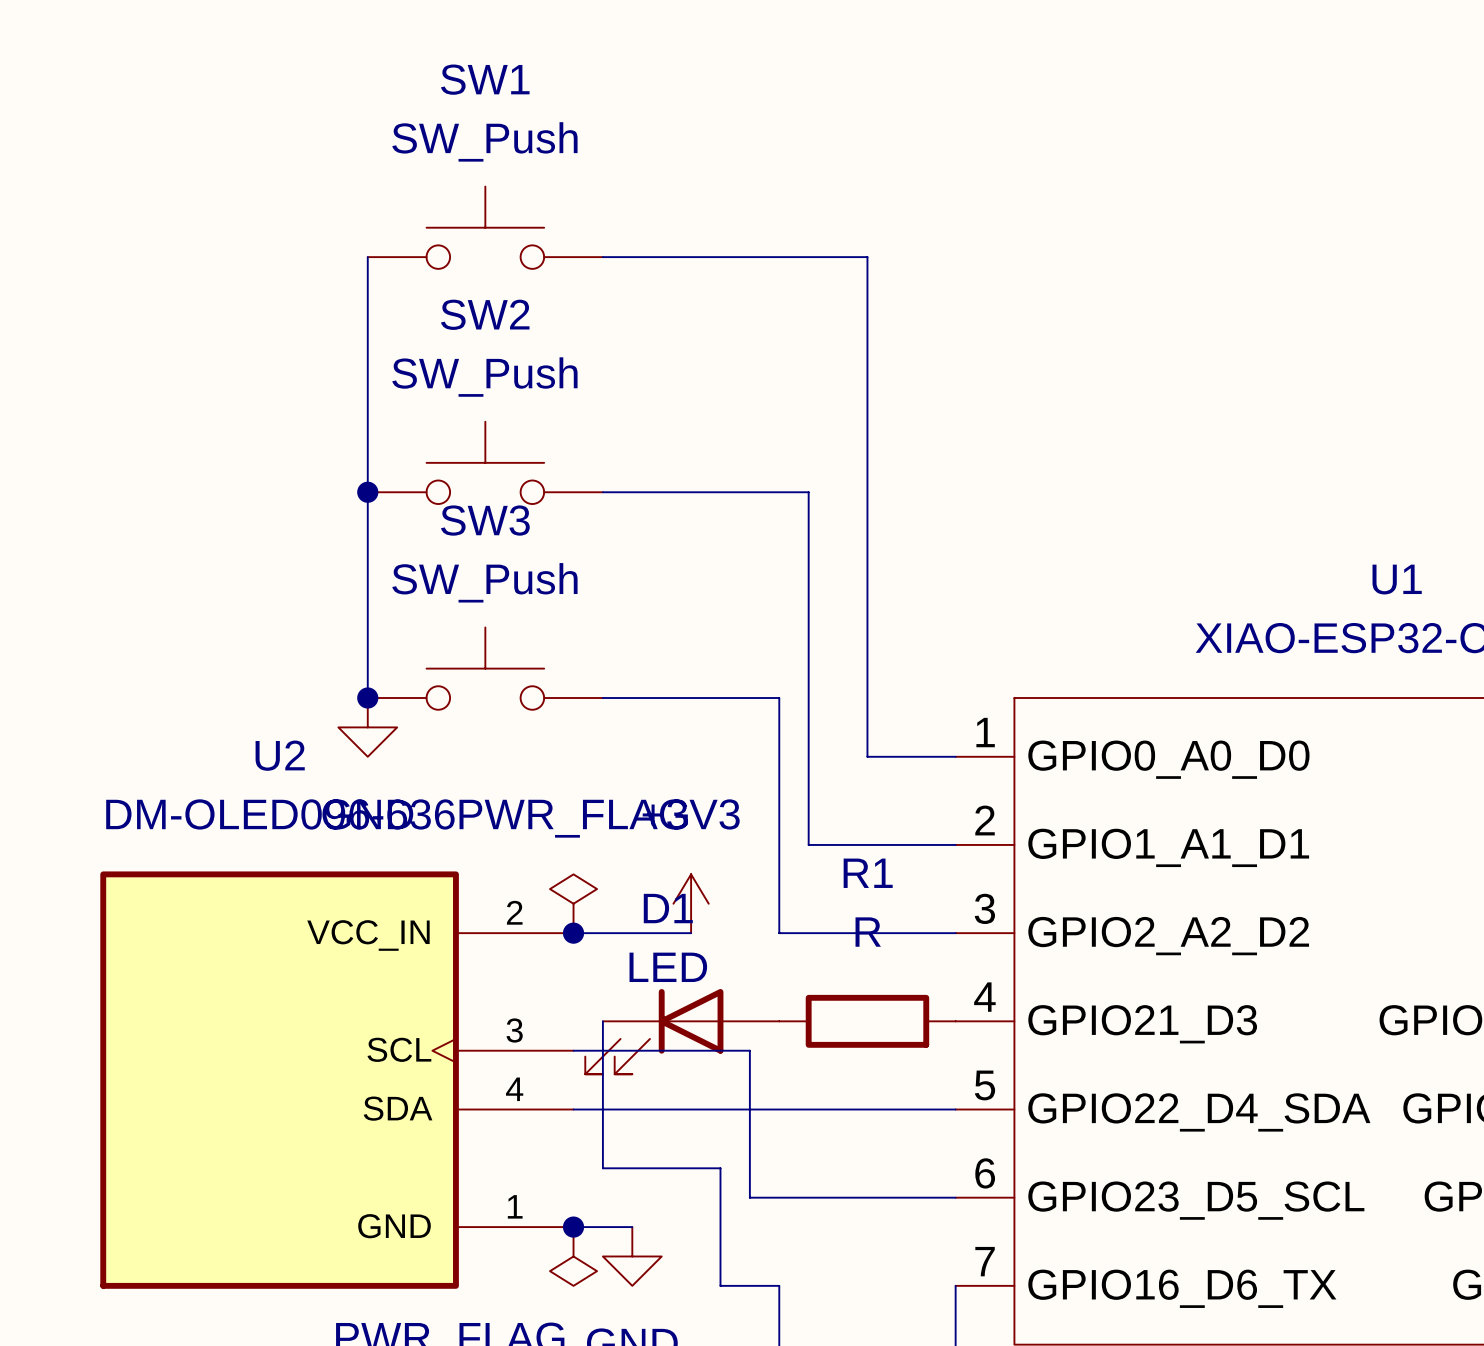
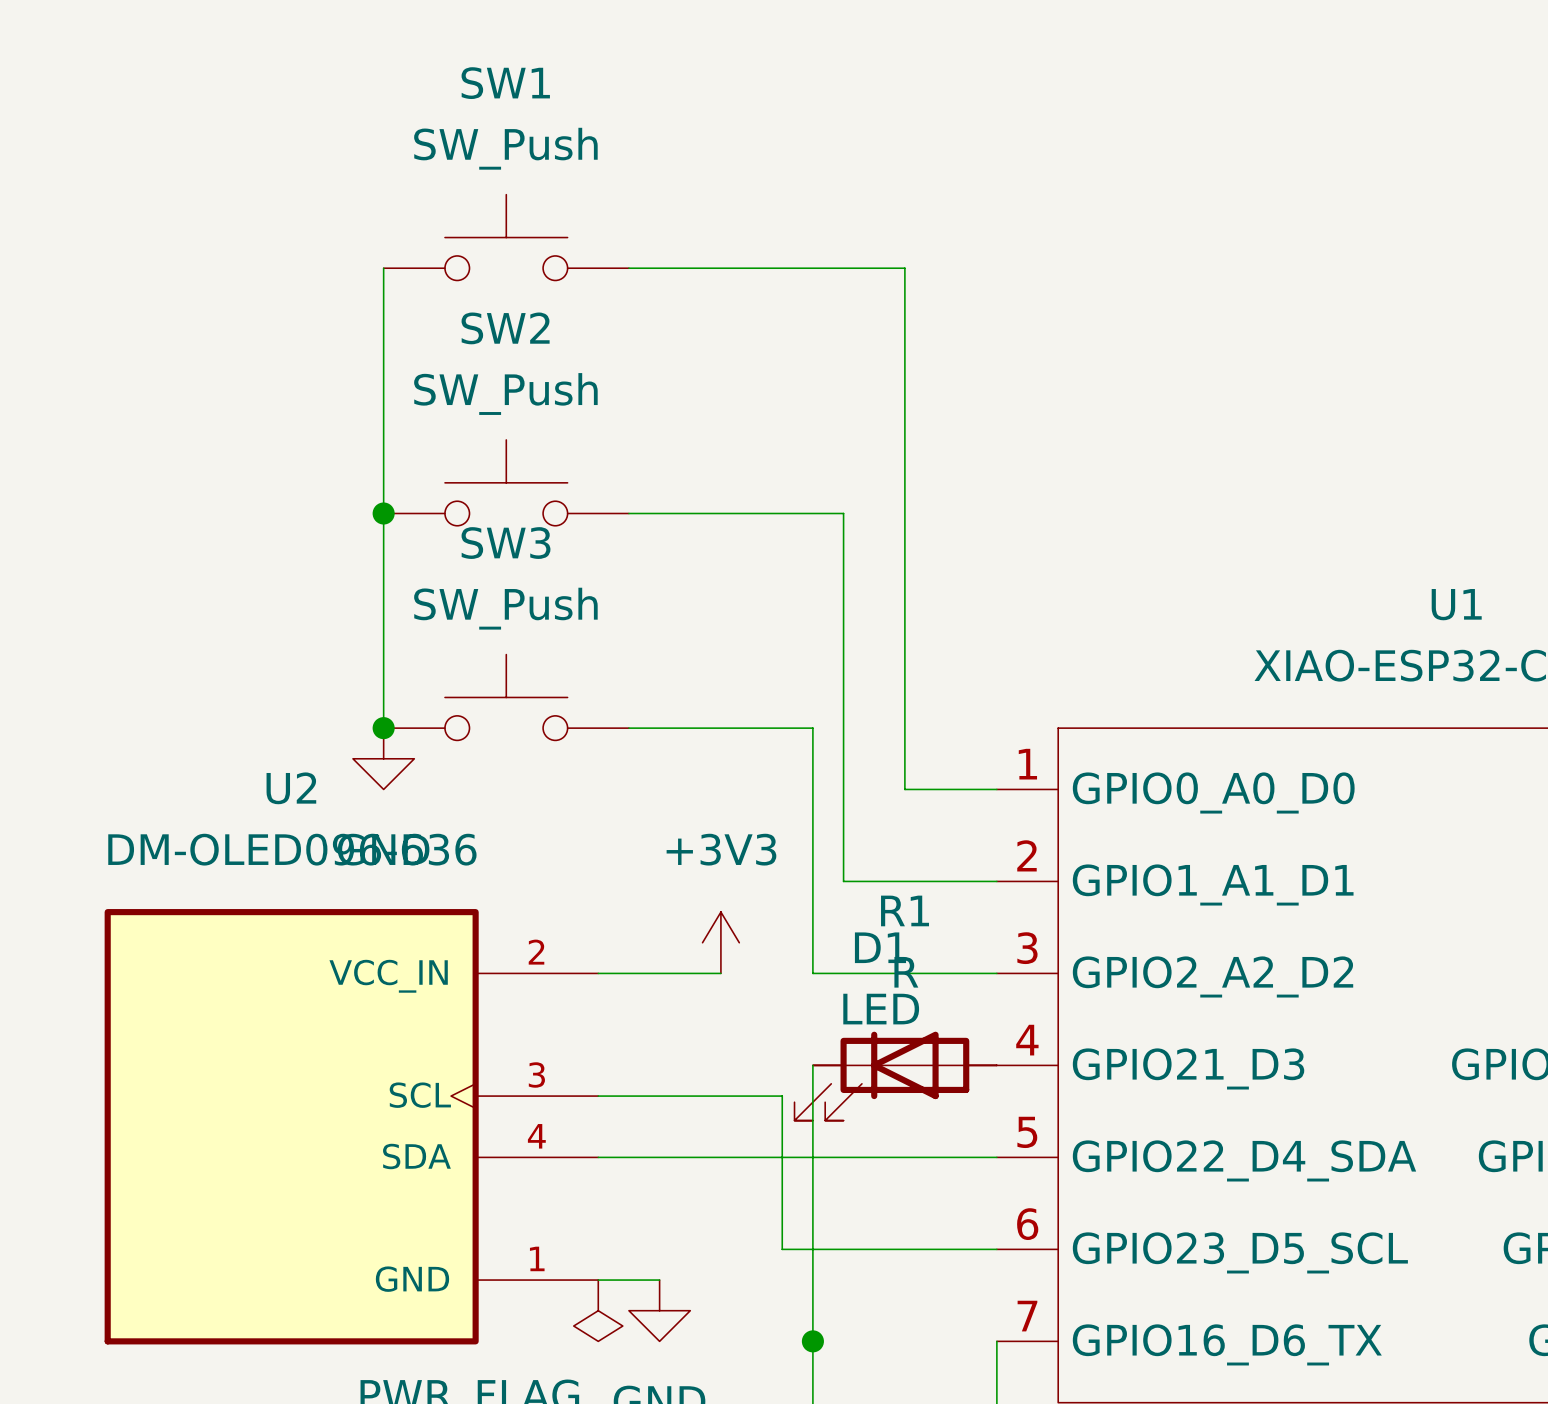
power symbol: PWR_FLAG (573, 903) -> none
junction: (573, 933) -> none
wire: (602, 1021) (602, 1168) (720, 1168) (720, 1285) (779, 1285) -> (812, 1065) (812, 1341)
D1 position: (682, 1031) -> (895, 1076)
junction: (573, 1227) -> none
junction: none -> (812, 1341)

